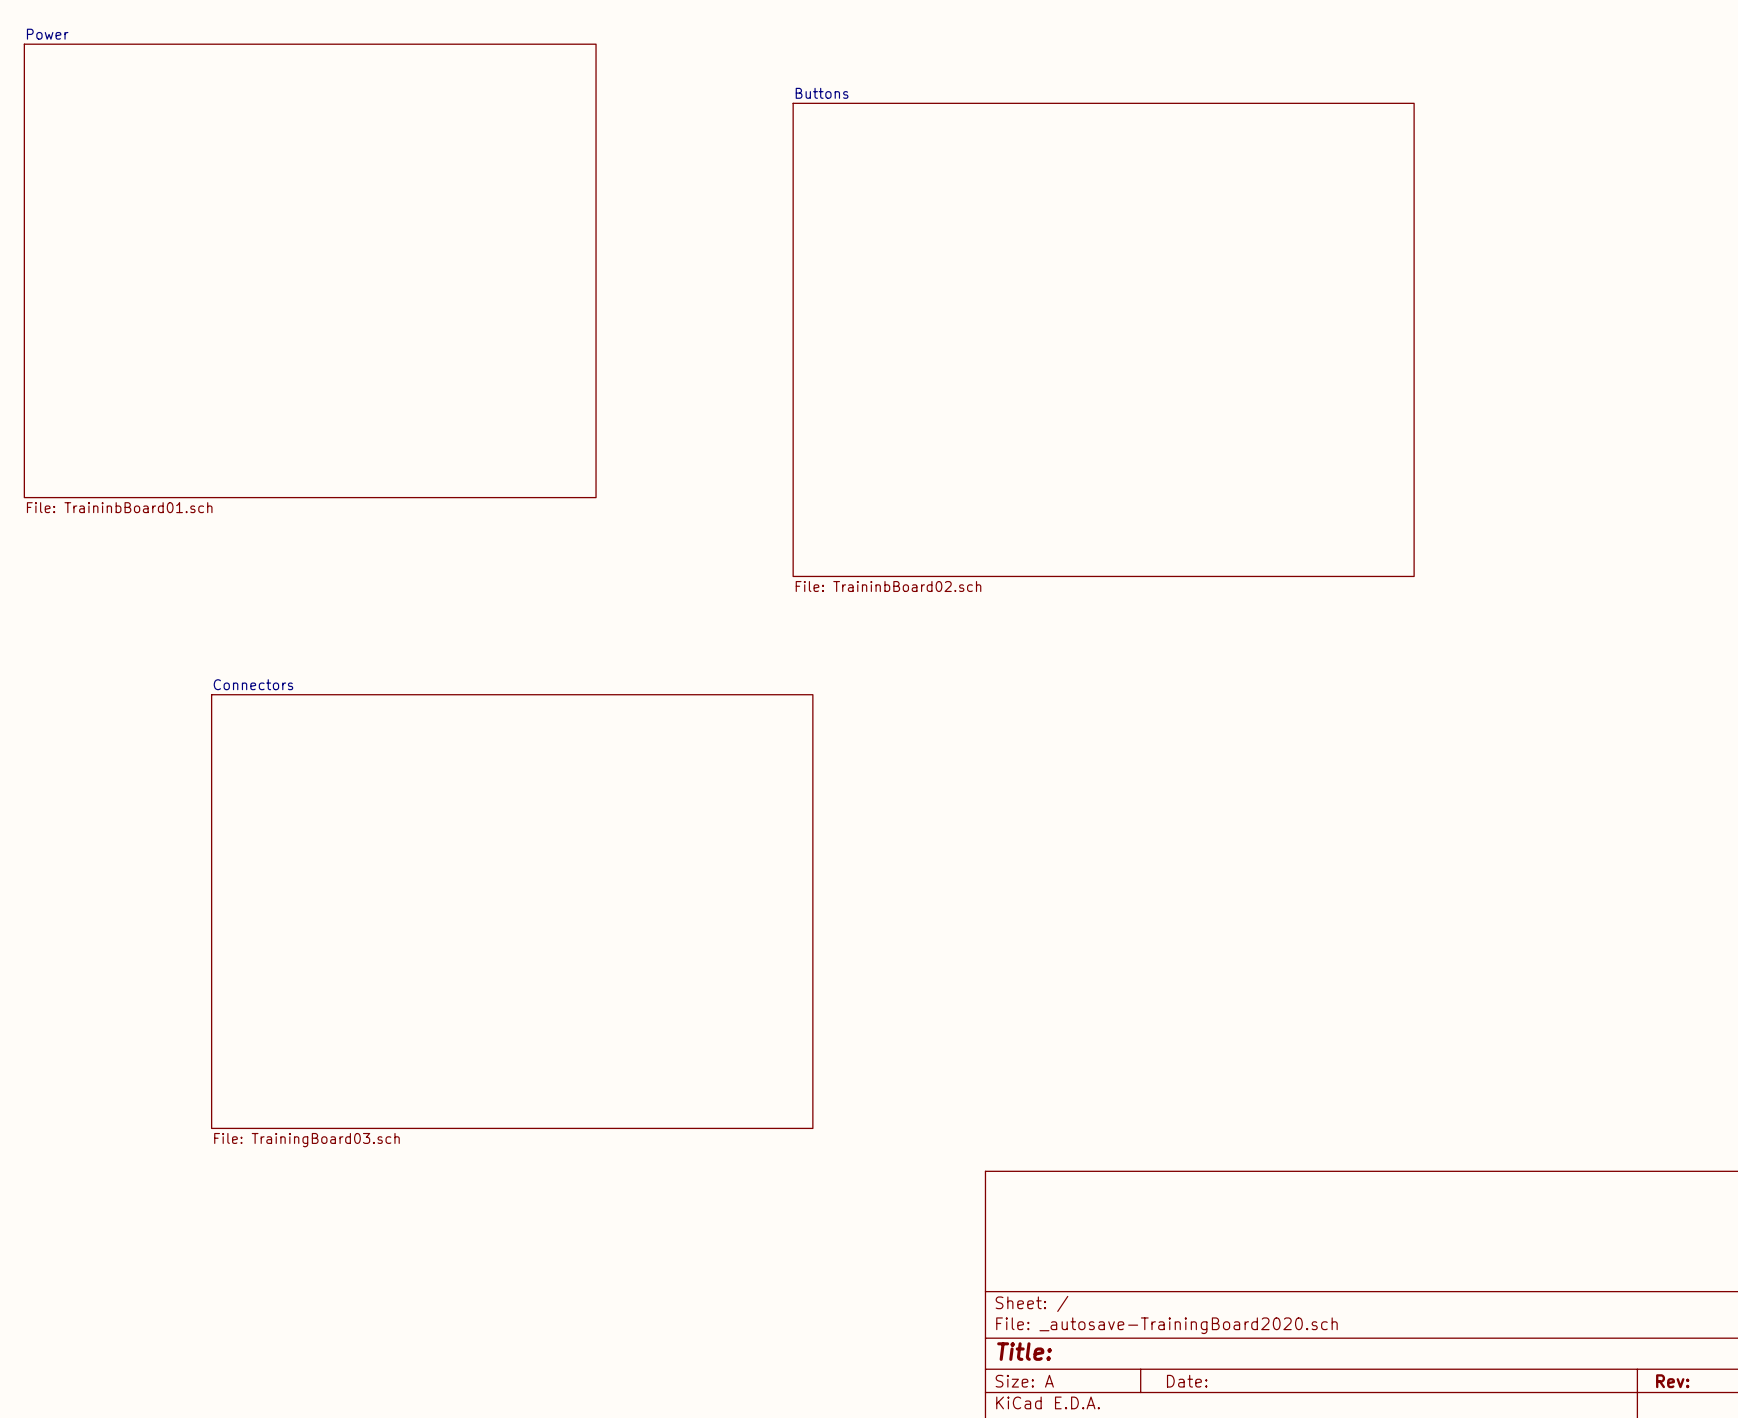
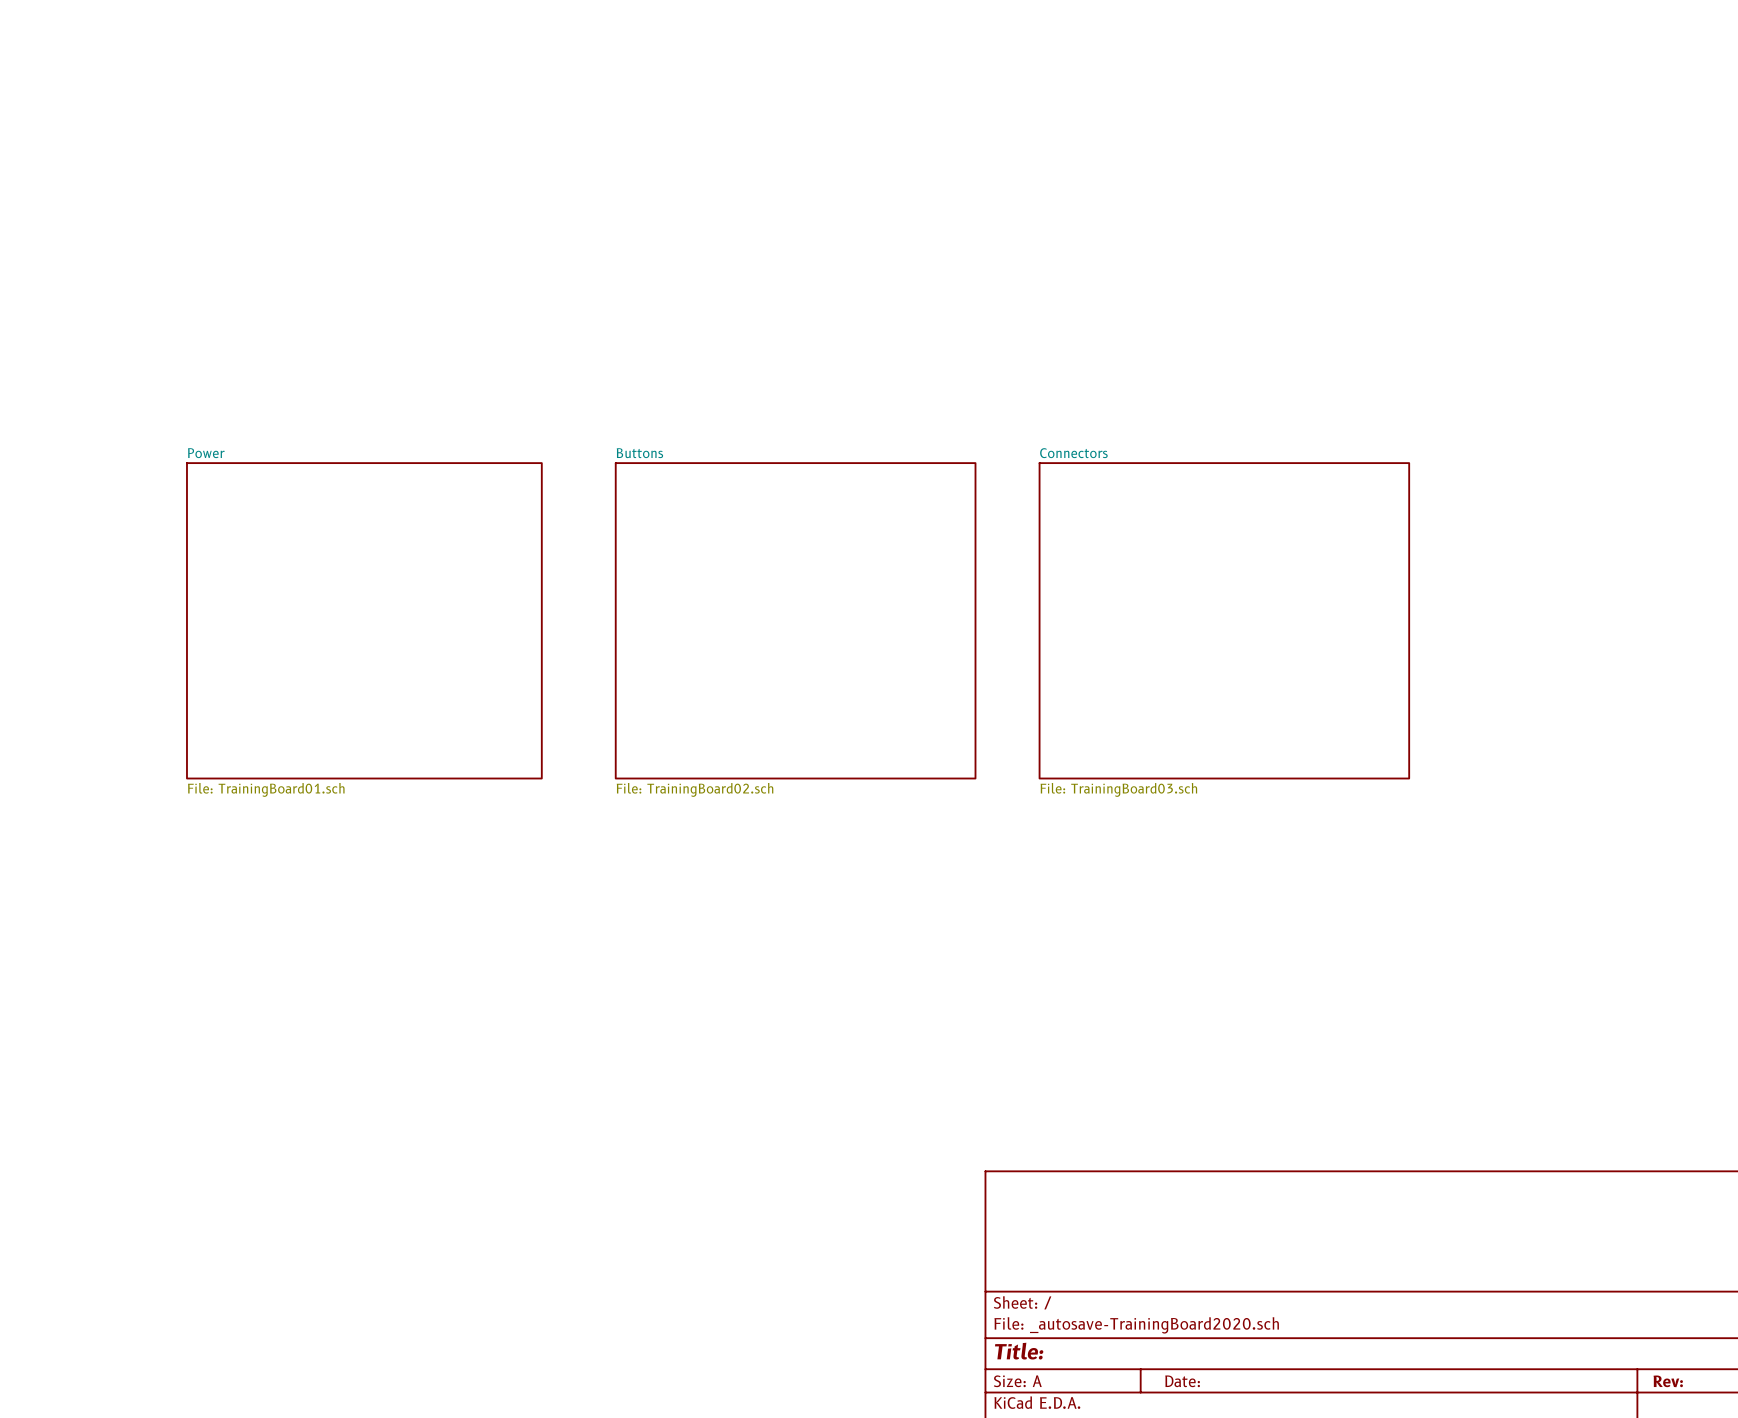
sheet Power: File: TraininbBoard01.sch (310, 270) -> none
sheet Buttons: File: TraininbBoard02.sch (1103, 339) -> none
sheet Power: none -> File: TrainingBoard01.sch (364, 620)
sheet Buttons: none -> File: TrainingBoard02.sch (795, 620)
sheet Connectors: none -> File: TrainingBoard03.sch (1224, 620)
sheet Connectors: File: TrainingBoard03.sch (512, 911) -> none

